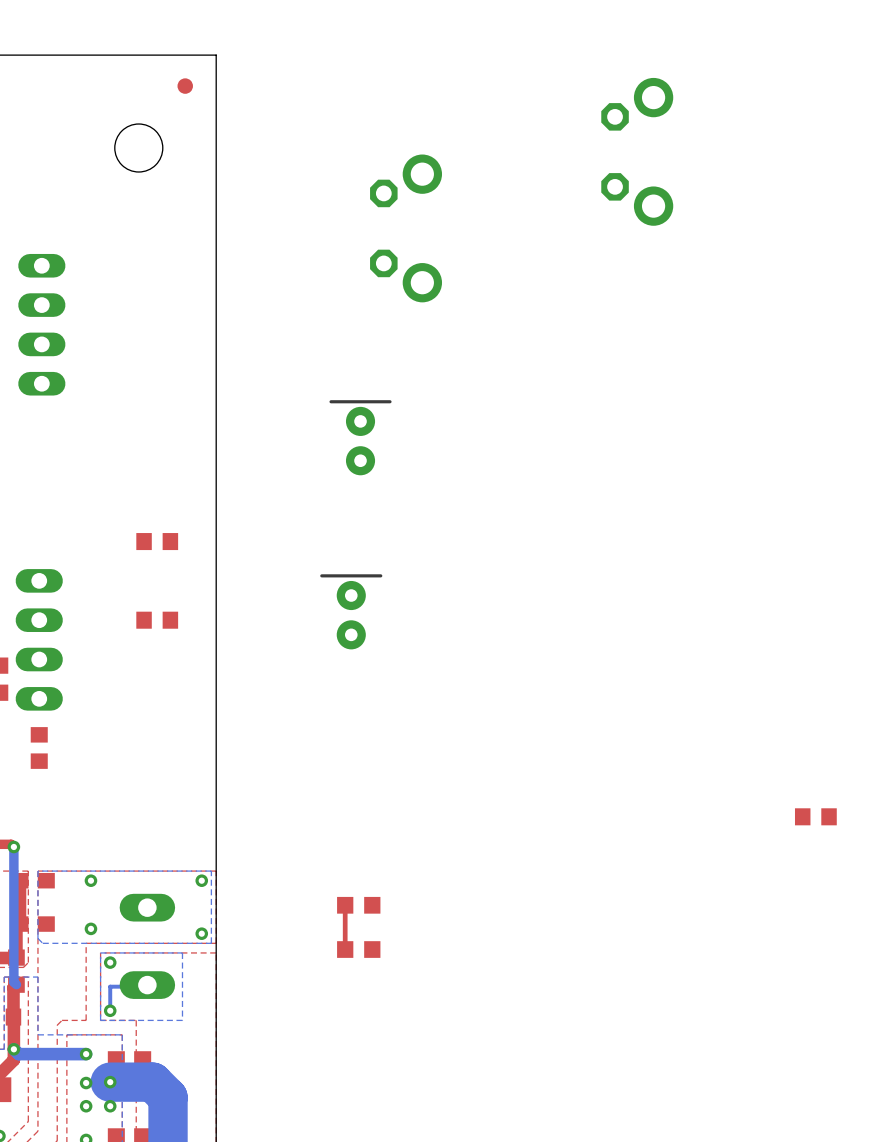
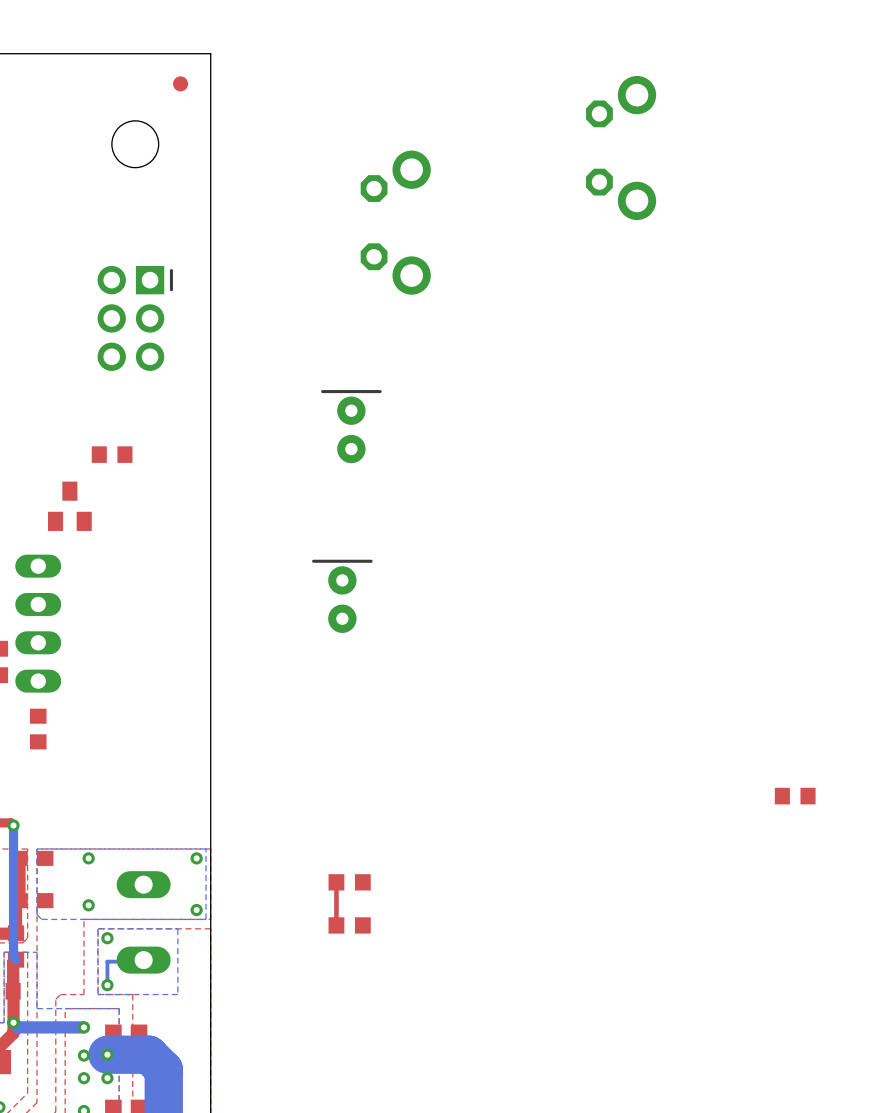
part: (41, 324) -> none
part: none -> (135, 318)
part: none -> (112, 454)
part: none -> (69, 506)
part: (157, 541) -> none
part: (157, 620) -> none

